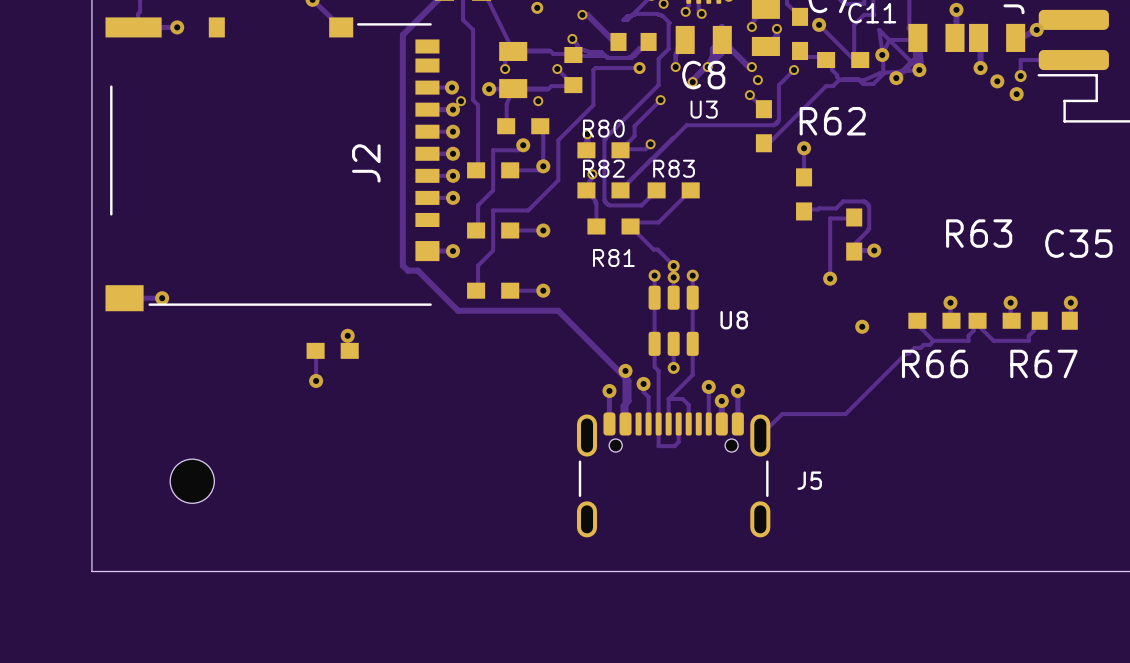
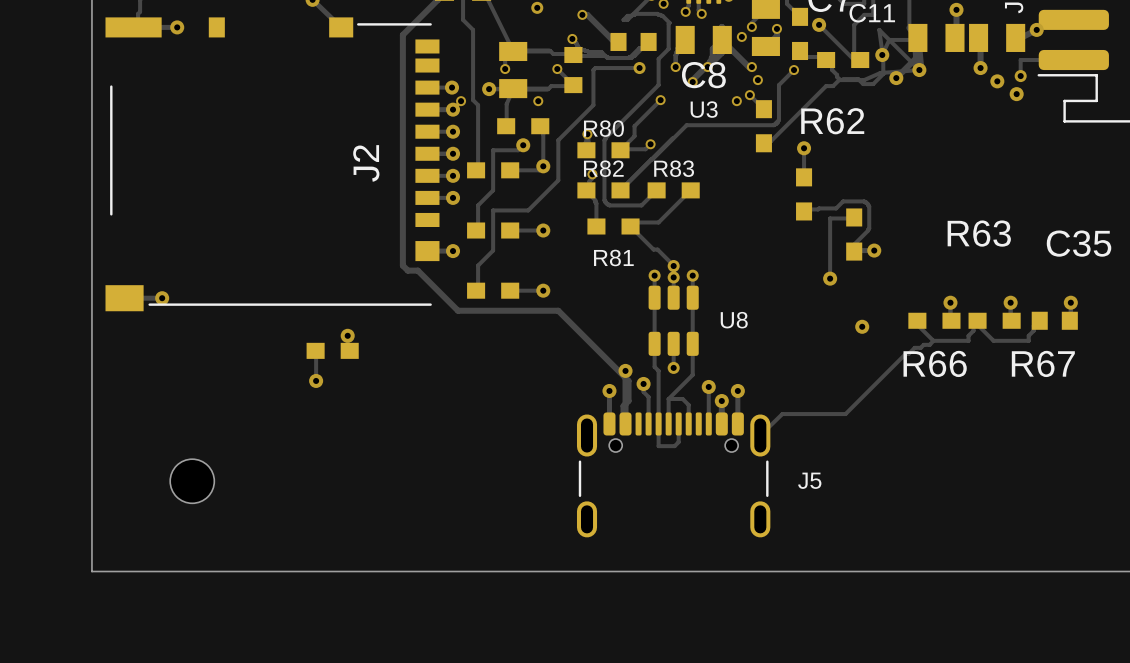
via: none -> (741, 36)
via: none -> (736, 101)

